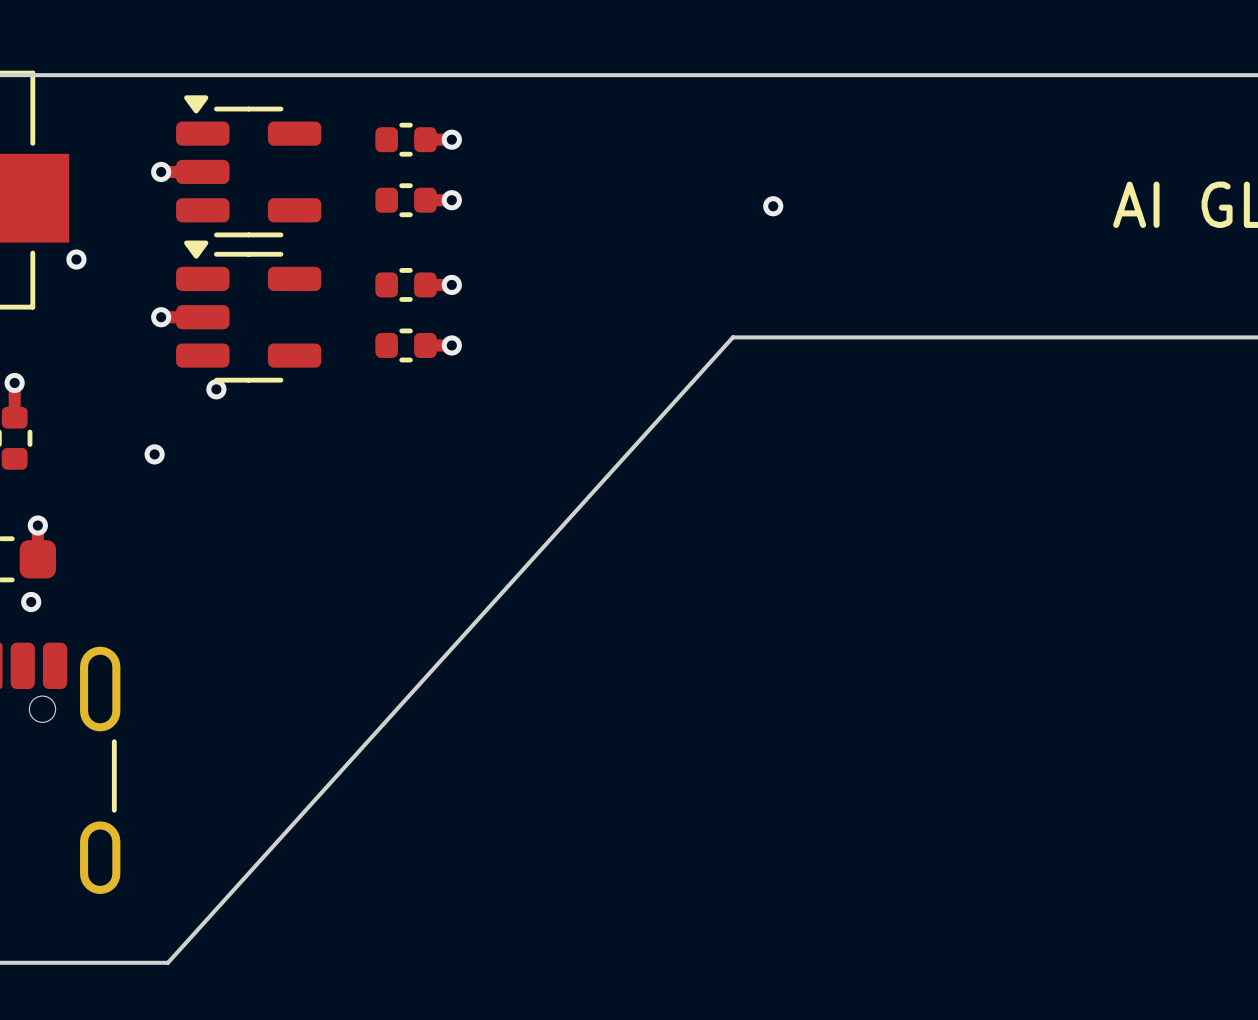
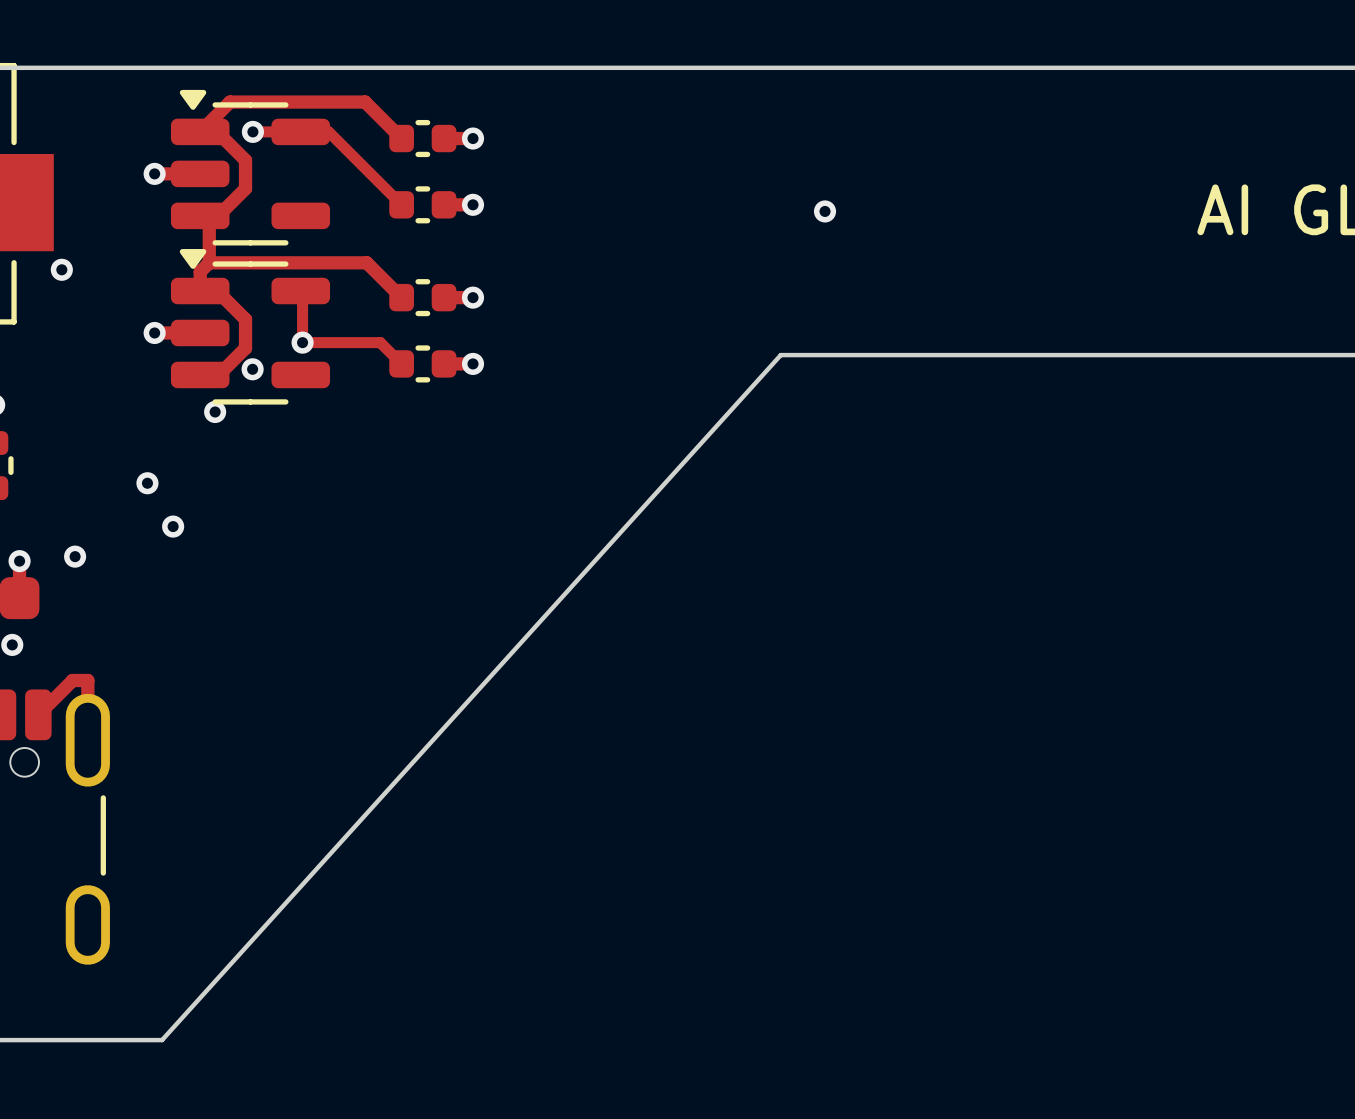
track: none -> (252, 131) (328, 131) (401, 204)
via: none -> (252, 131)
track: none -> (401, 138) (365, 102) (230, 102) (200, 131) (217, 131) (245, 160) (245, 188) (218, 215) (200, 215)
track: none -> (209, 215) (209, 262)
track: none -> (209, 262) (366, 262) (401, 297)
track: none -> (209, 262) (200, 271) (200, 291) (217, 291) (245, 319) (245, 348) (218, 374) (200, 374)
track: none -> (300, 291) (302, 292) (302, 342) (380, 342) (401, 363)
via: none -> (302, 342)
via: none -> (252, 369)
via: none -> (173, 526)
via: none -> (75, 556)
track: none -> (38, 714) (72, 680) (87, 680) (87, 740)

